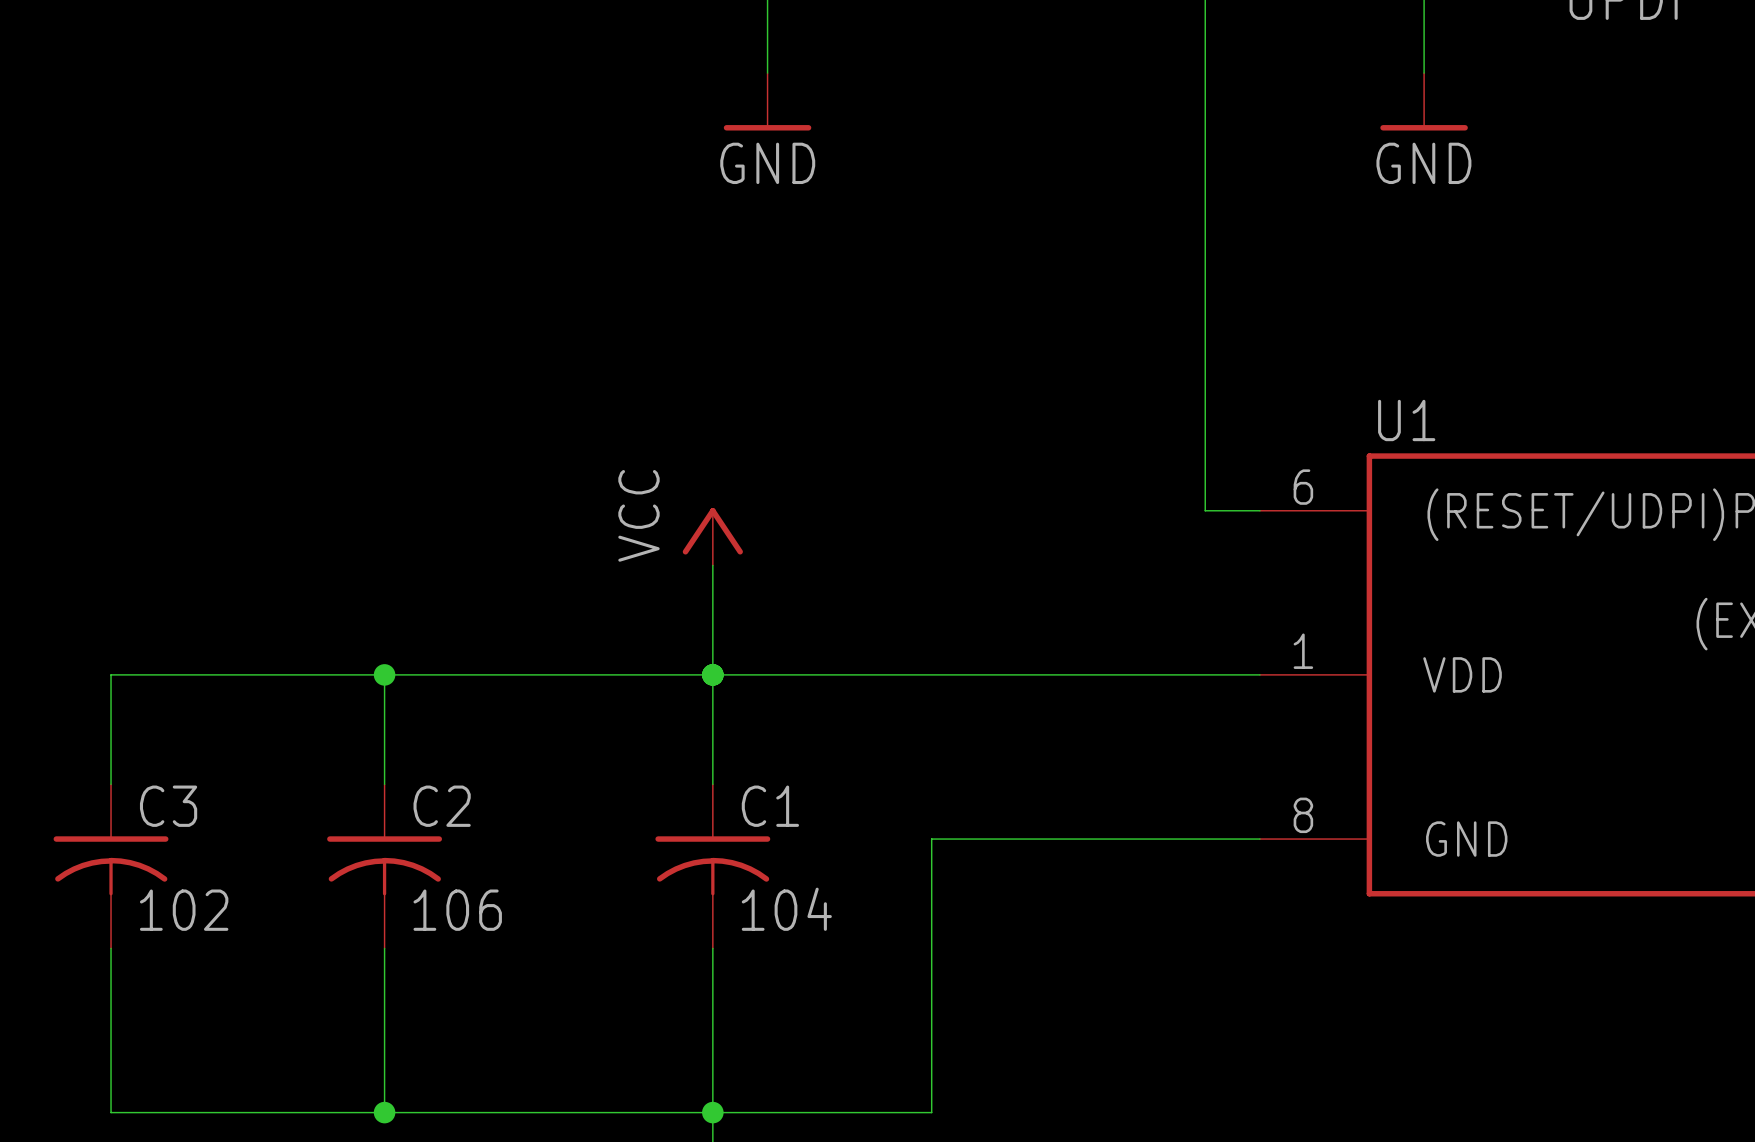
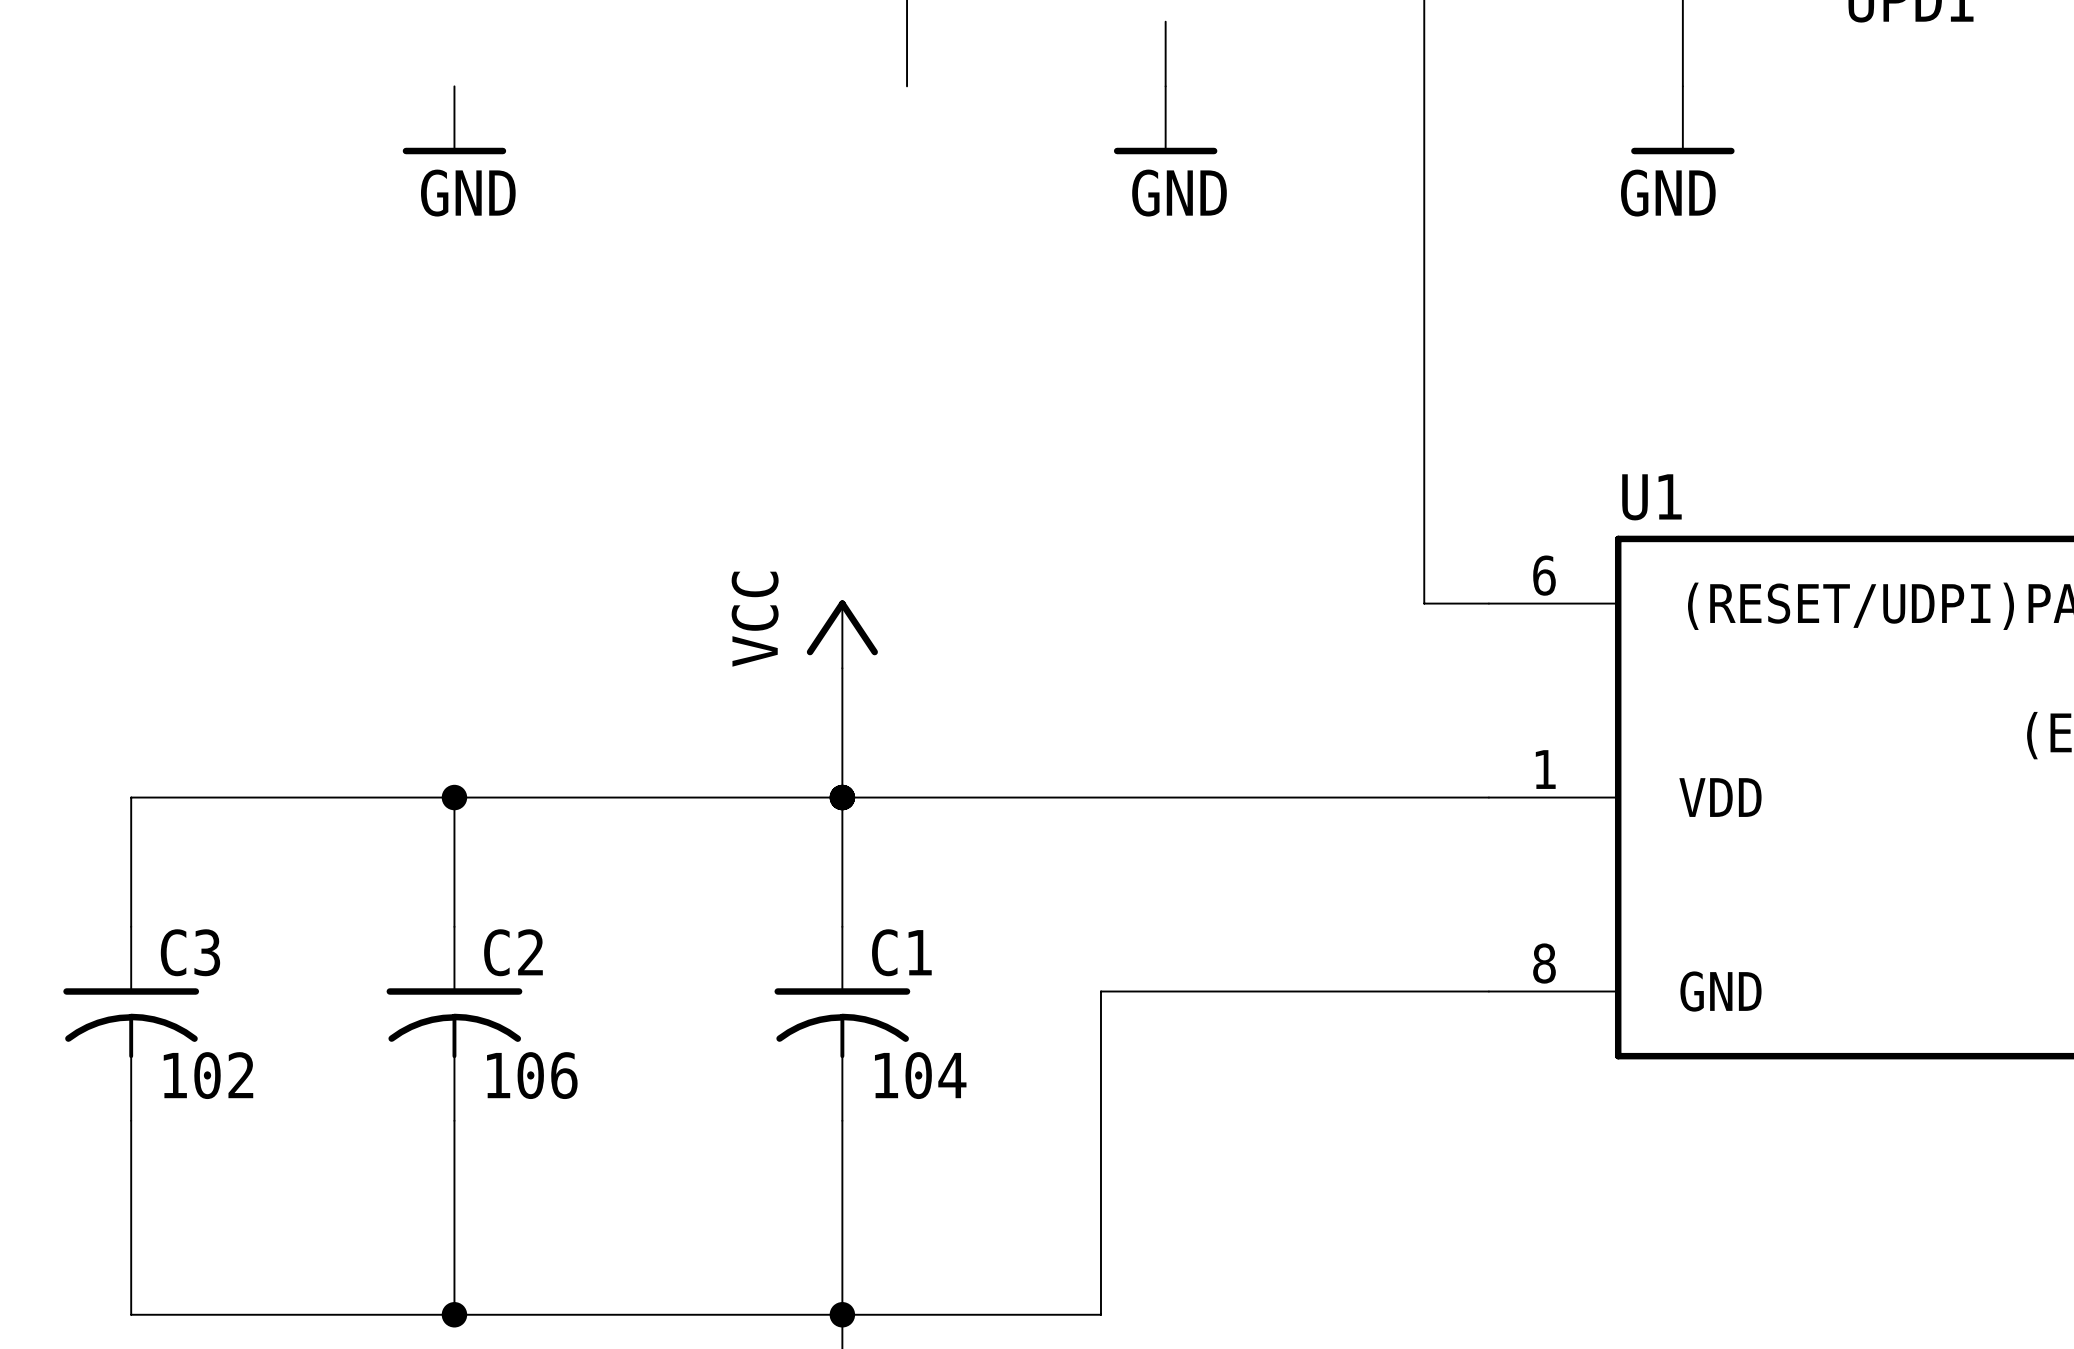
wire: none -> (1165, 21) (1165, 86)
power symbol: none -> GND (454, 120)
power symbol: GND (767, 101) -> none
power symbol: none -> GND (1165, 120)

